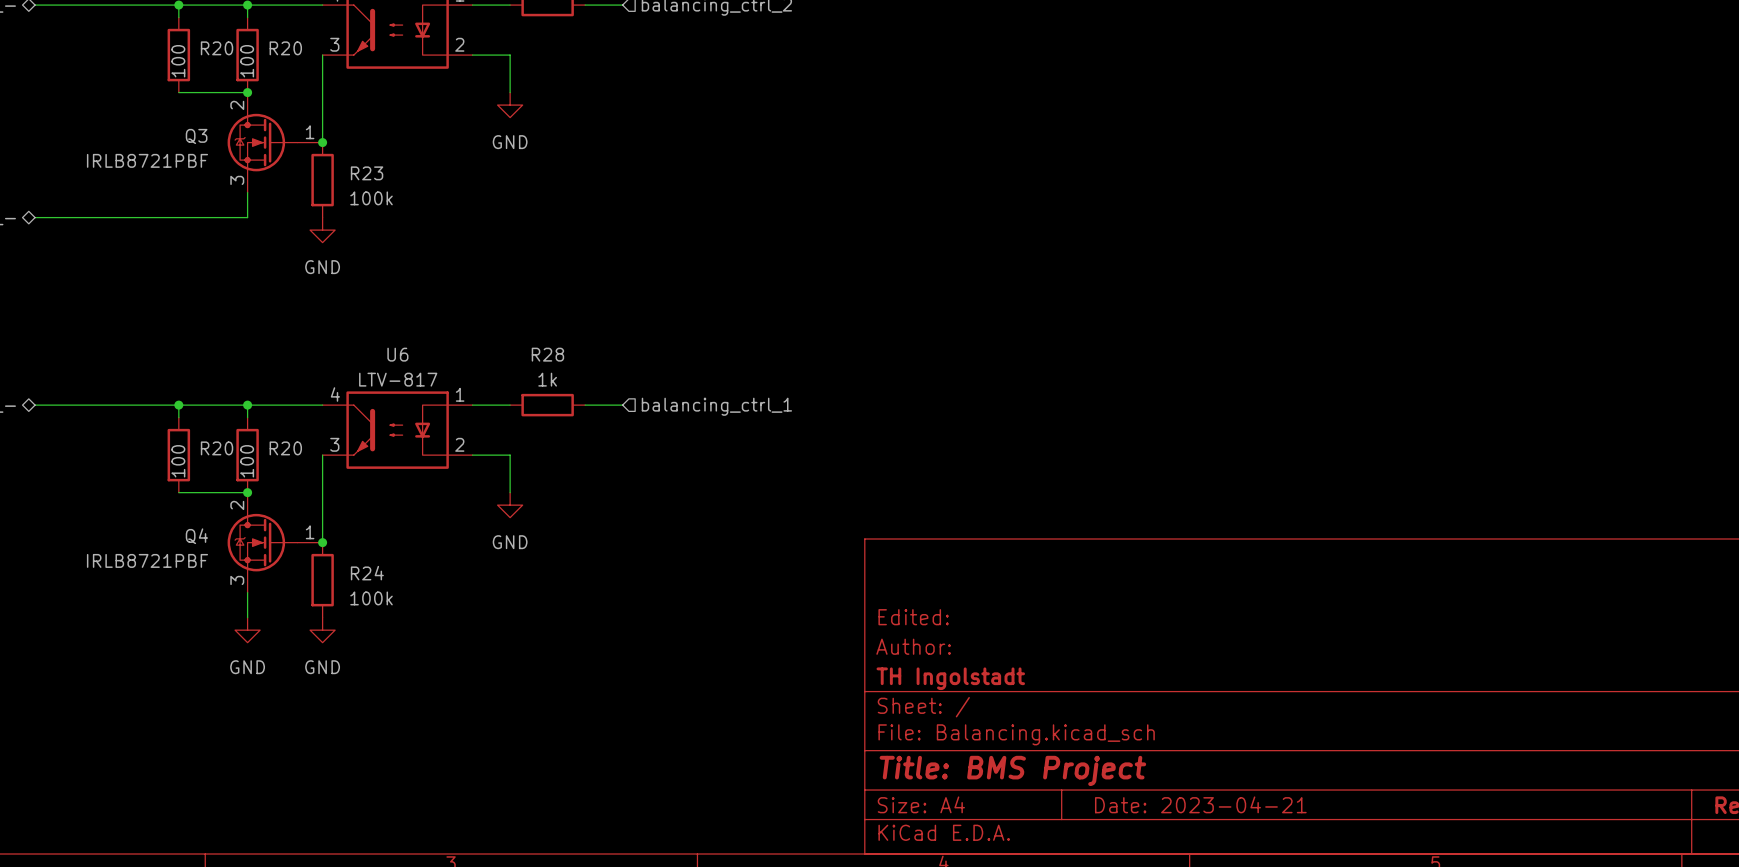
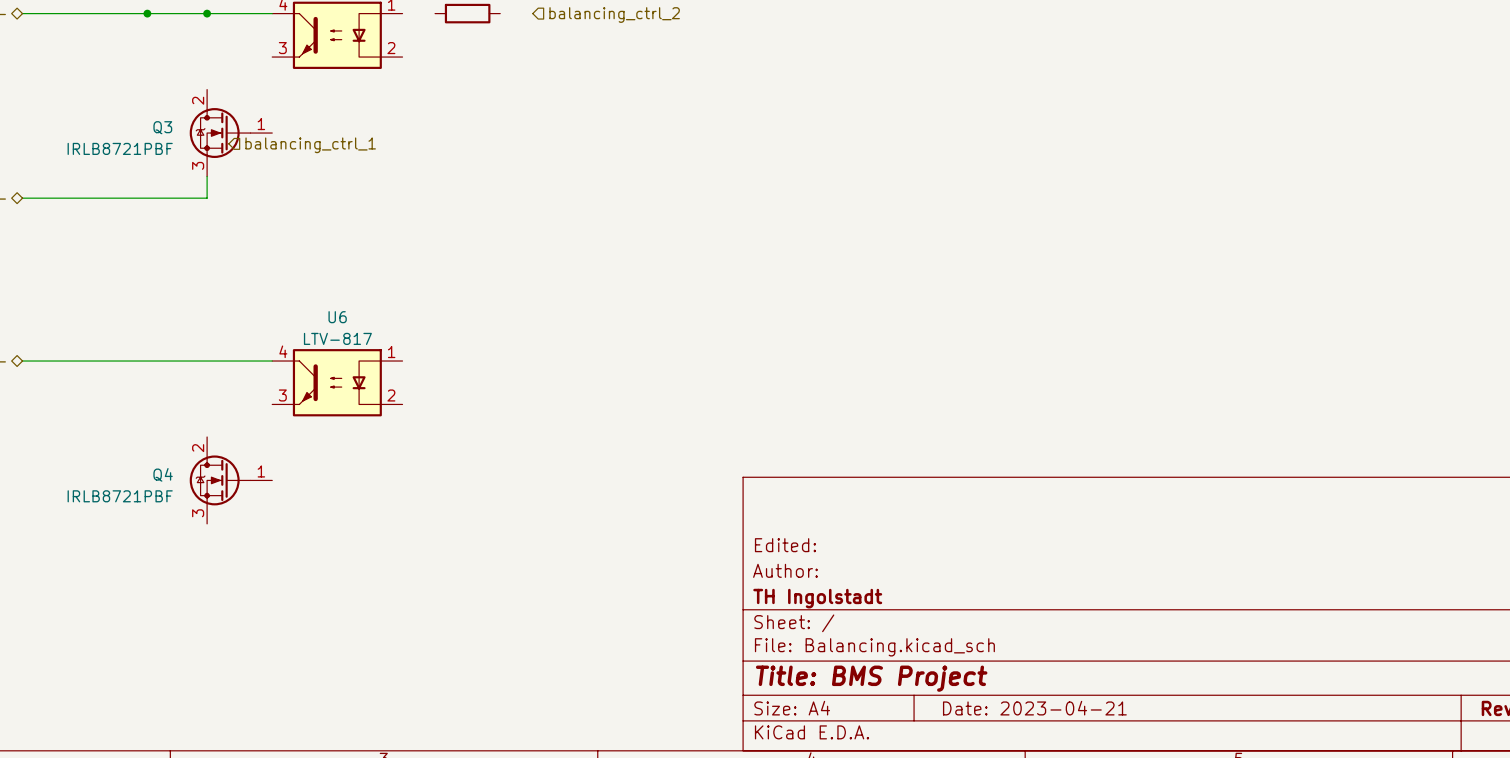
wire: (178, 5) (178, 17) -> none
wire: (247, 5) (247, 17) -> none
wire: (472, 5) (510, 5) -> none
wire: (585, 5) (622, 5) -> none
R20: 100 (178, 55) -> none
R20: 100 (247, 55) -> none
wire: (322, 55) (322, 142) -> none
wire: (472, 55) (510, 55) (510, 92) -> none
wire: (178, 92) (247, 92) -> none
junction: (247, 92) -> none
power symbol: GND (510, 105) -> none
junction: (322, 142) -> none
hierarchical label: none -> balancing_ctrl_1 (310, 145)
R23: 100k (322, 180) -> none
power symbol: GND (322, 230) -> none
wire: (178, 405) (178, 417) -> none
junction: (178, 405) -> none
wire: (247, 405) (247, 417) -> none
junction: (247, 405) -> none
wire: (472, 405) (510, 405) -> none
R28: 1k (547, 405) -> none
wire: (585, 405) (622, 405) -> none
hierarchical label: balancing_ctrl_1 (716, 406) -> none
R20: 100 (178, 455) -> none
R20: 100 (247, 455) -> none
wire: (322, 455) (322, 542) -> none
wire: (472, 455) (510, 455) (510, 492) -> none
wire: (178, 492) (247, 492) -> none
junction: (247, 492) -> none
power symbol: GND (510, 505) -> none
junction: (322, 542) -> none
R24: 100k (322, 580) -> none
wire: (247, 592) (247, 617) -> none
power symbol: GND (247, 630) -> none
power symbol: GND (322, 630) -> none

